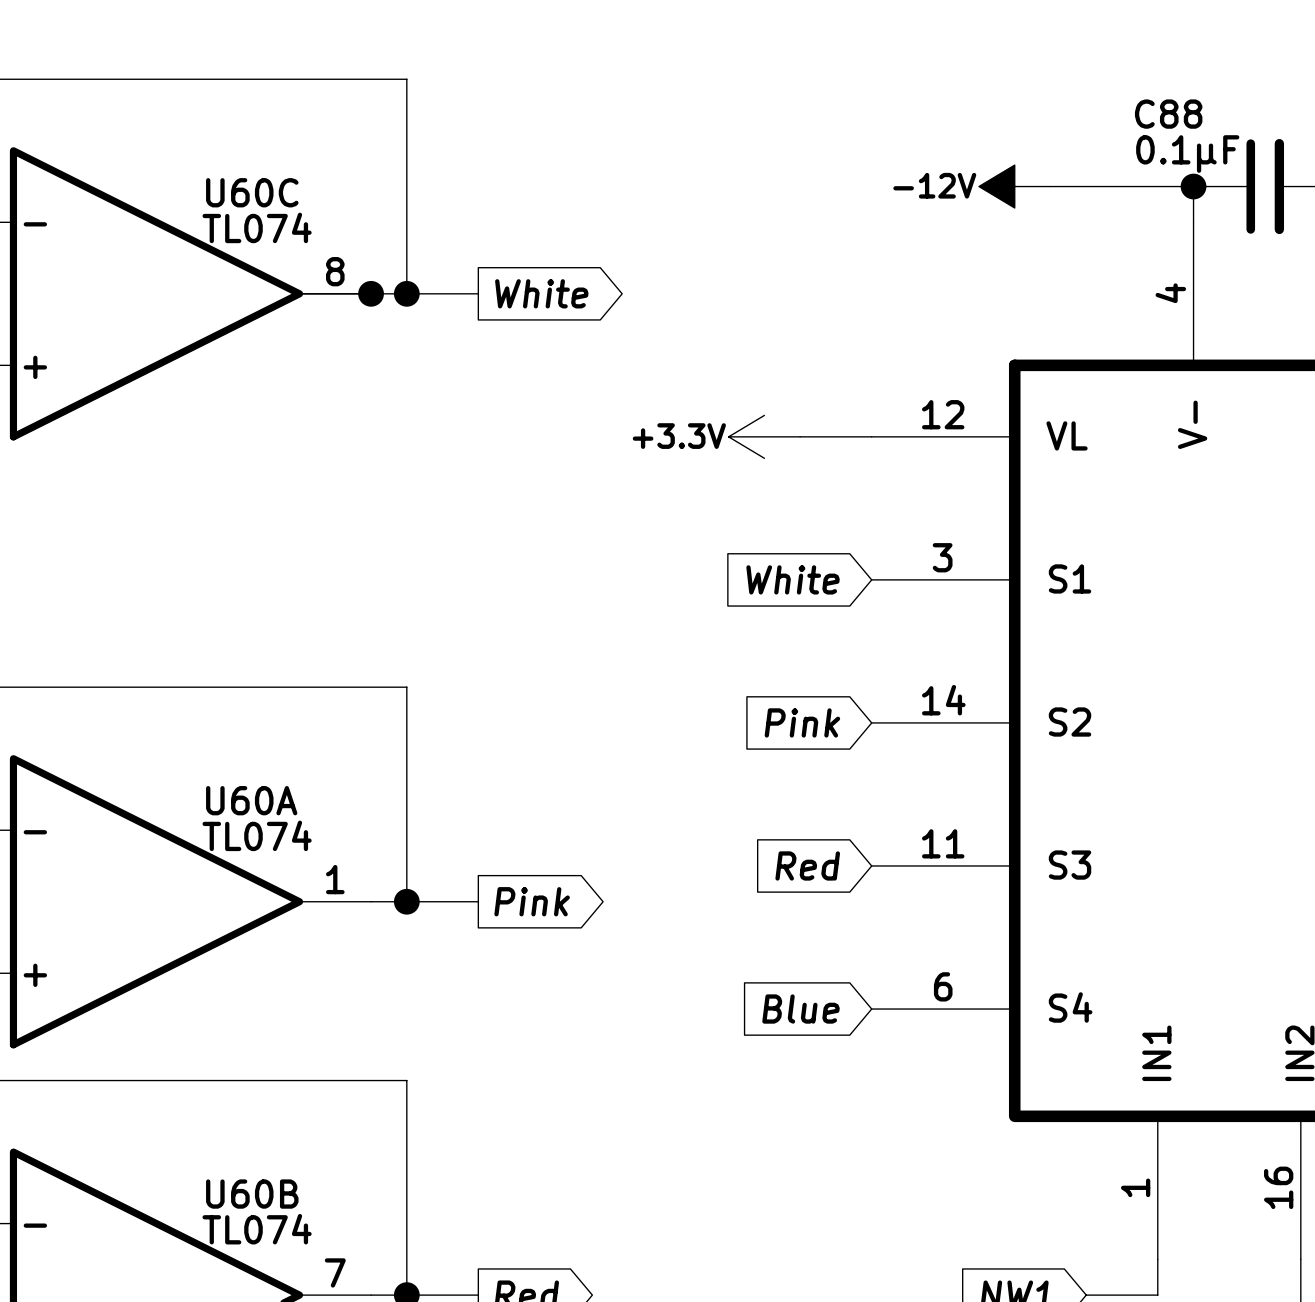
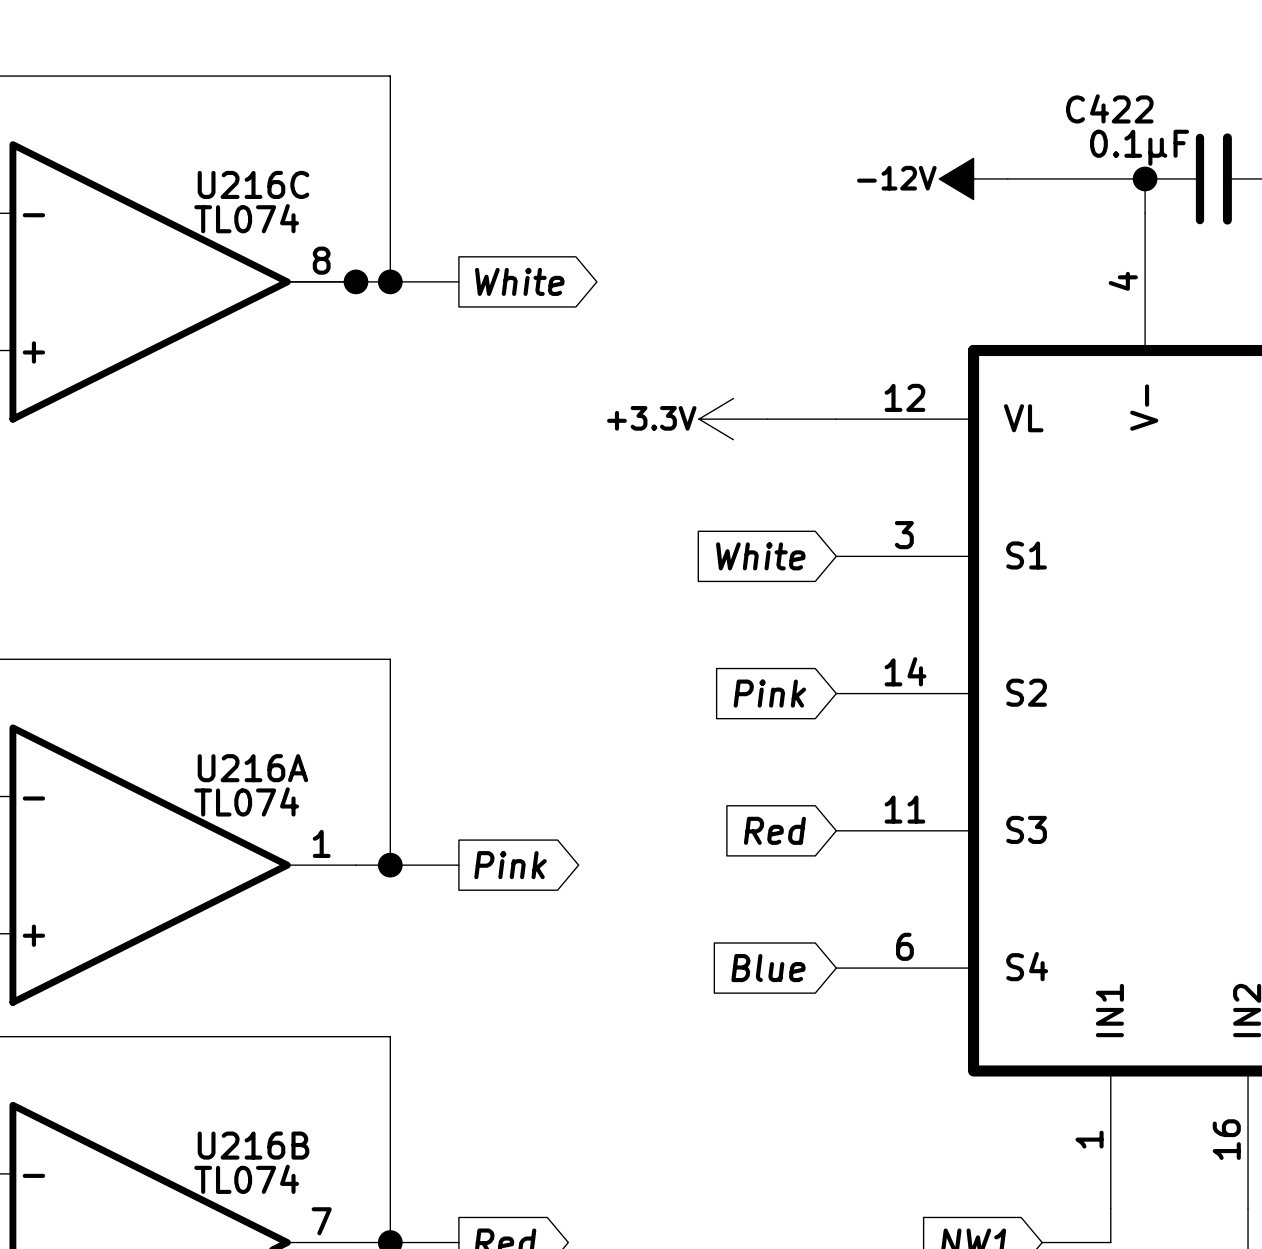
C88 name: C88 (1168, 114) -> C422 (1109, 108)
U60C name: U60C (252, 192) -> U216C (253, 184)
U60A name: U60A (251, 800) -> U216A (252, 768)
U60B name: U60B (252, 1194) -> U216B (253, 1145)

